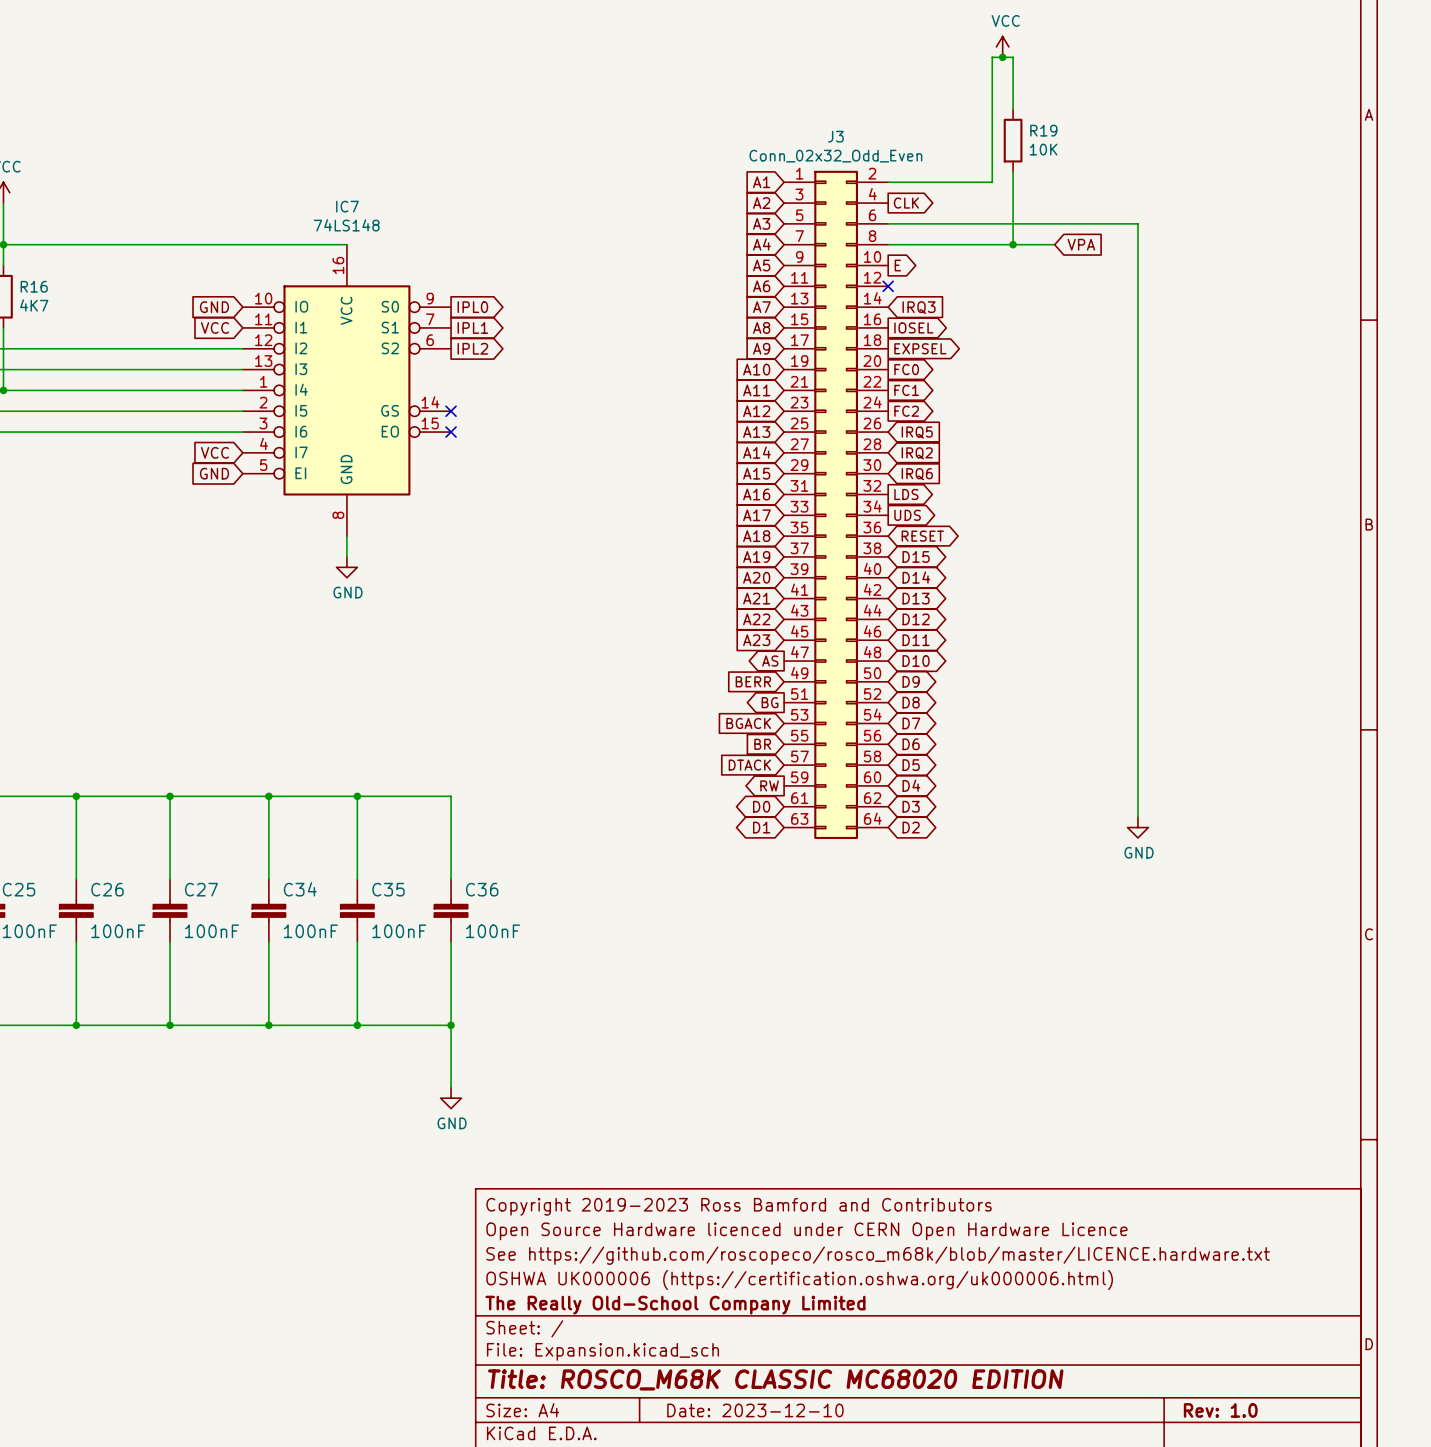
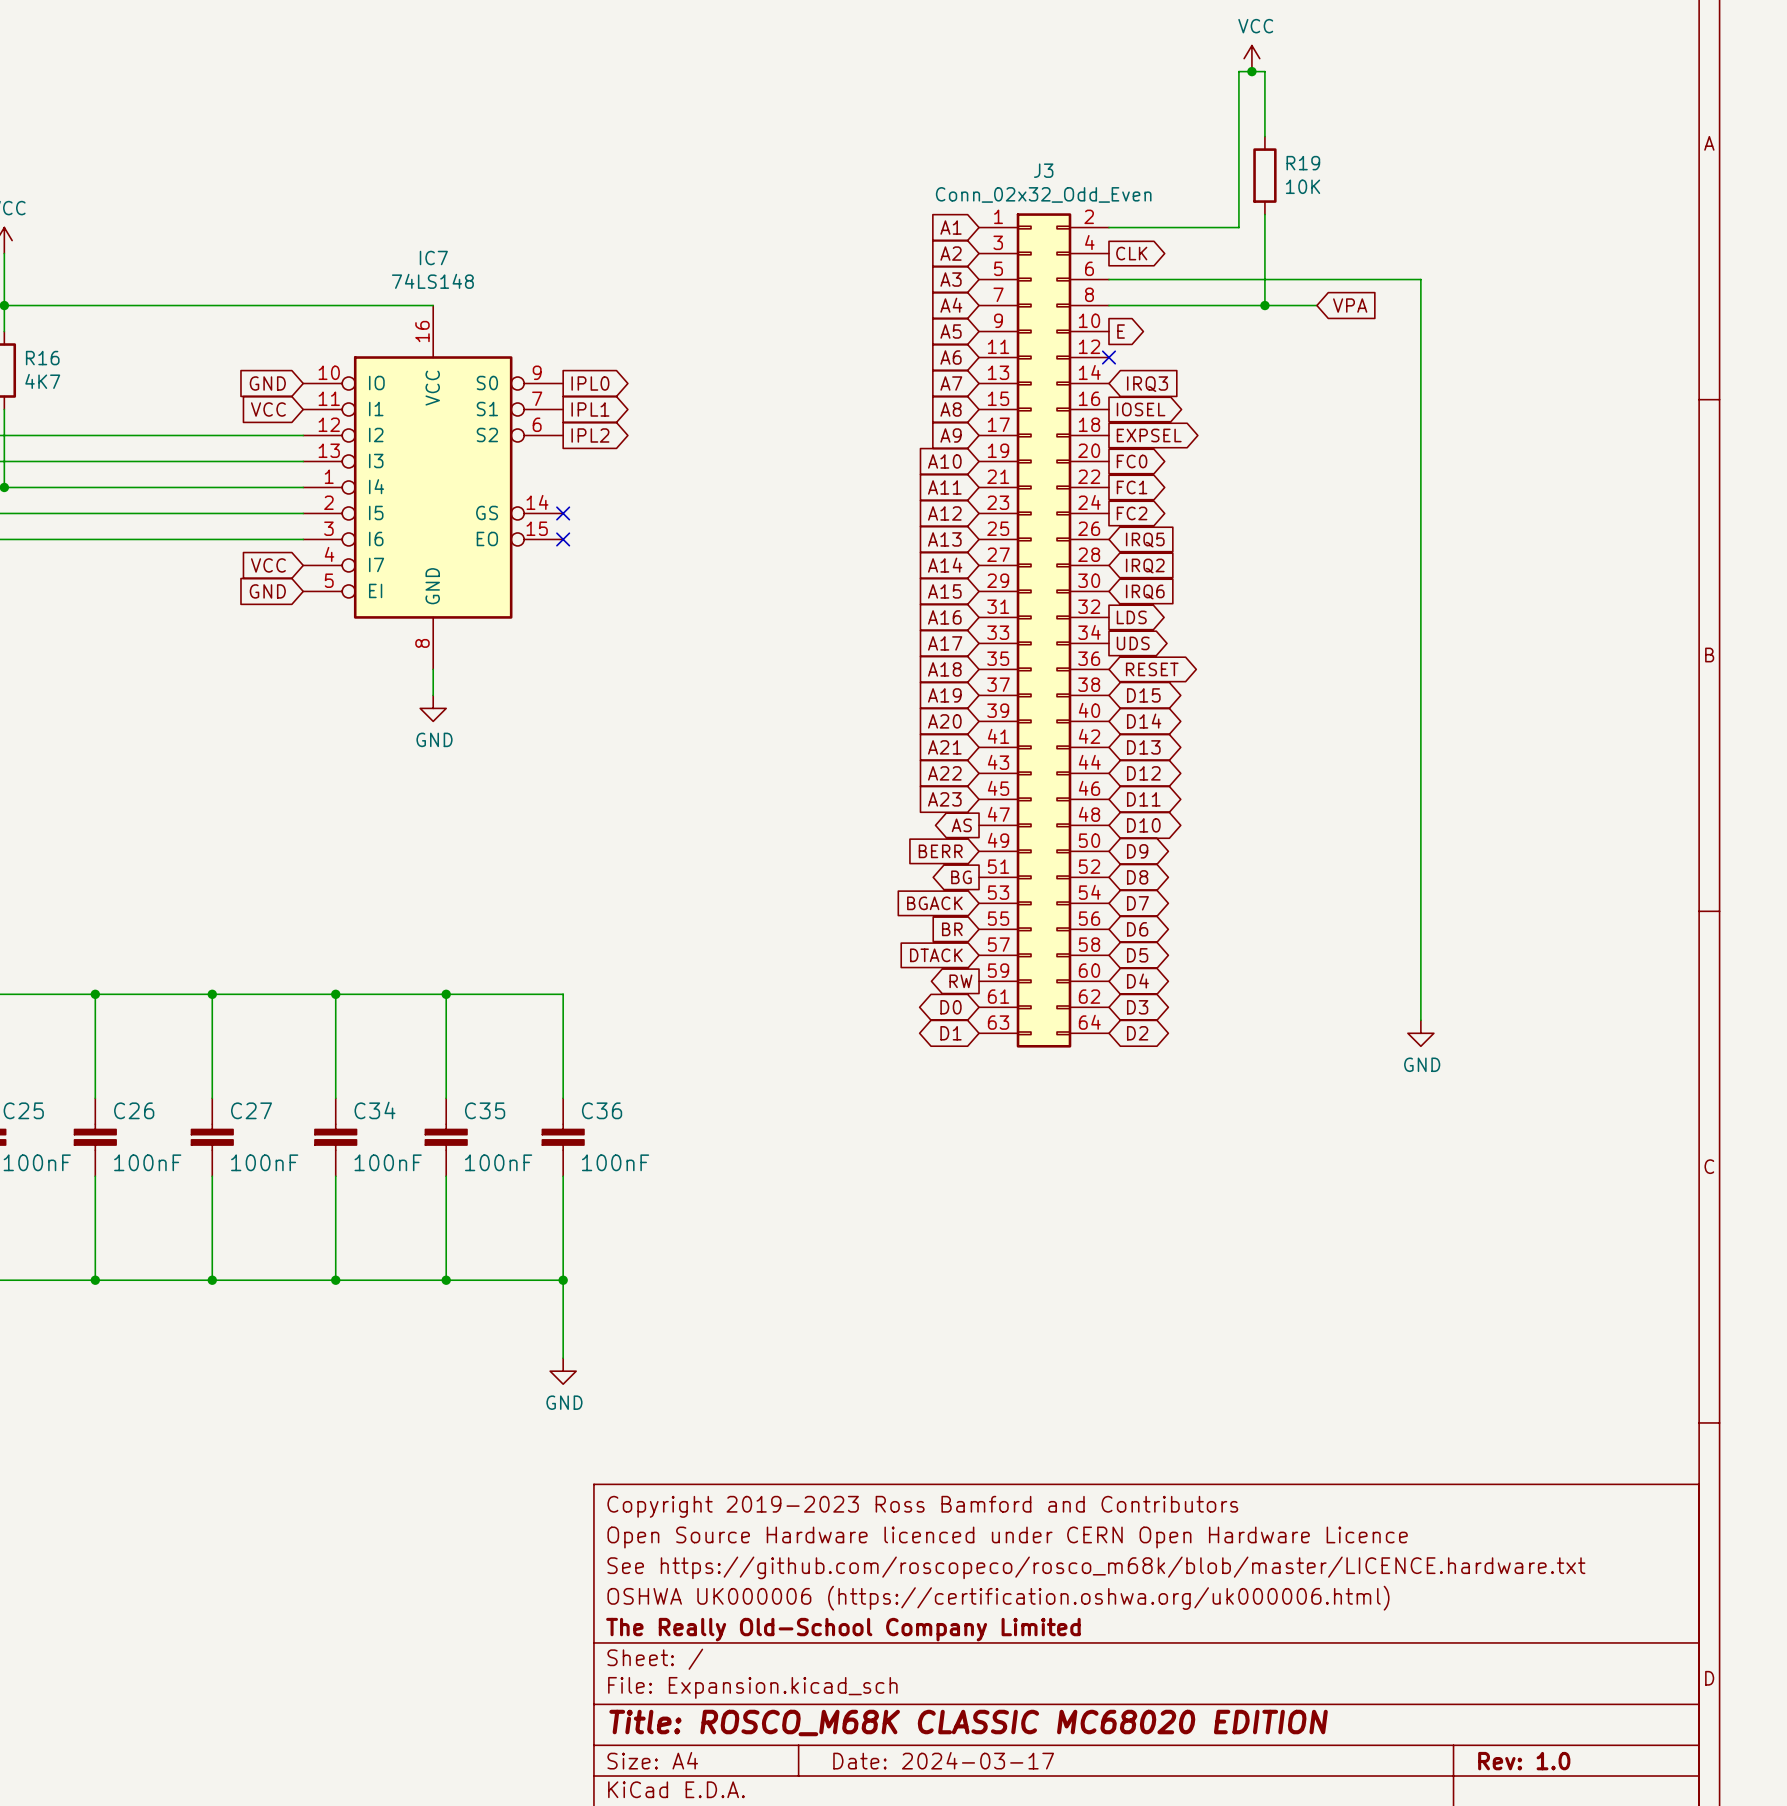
title block: Date: 2023-12-10 (755, 1410) -> Date: 2024-03-17 (943, 1760)

